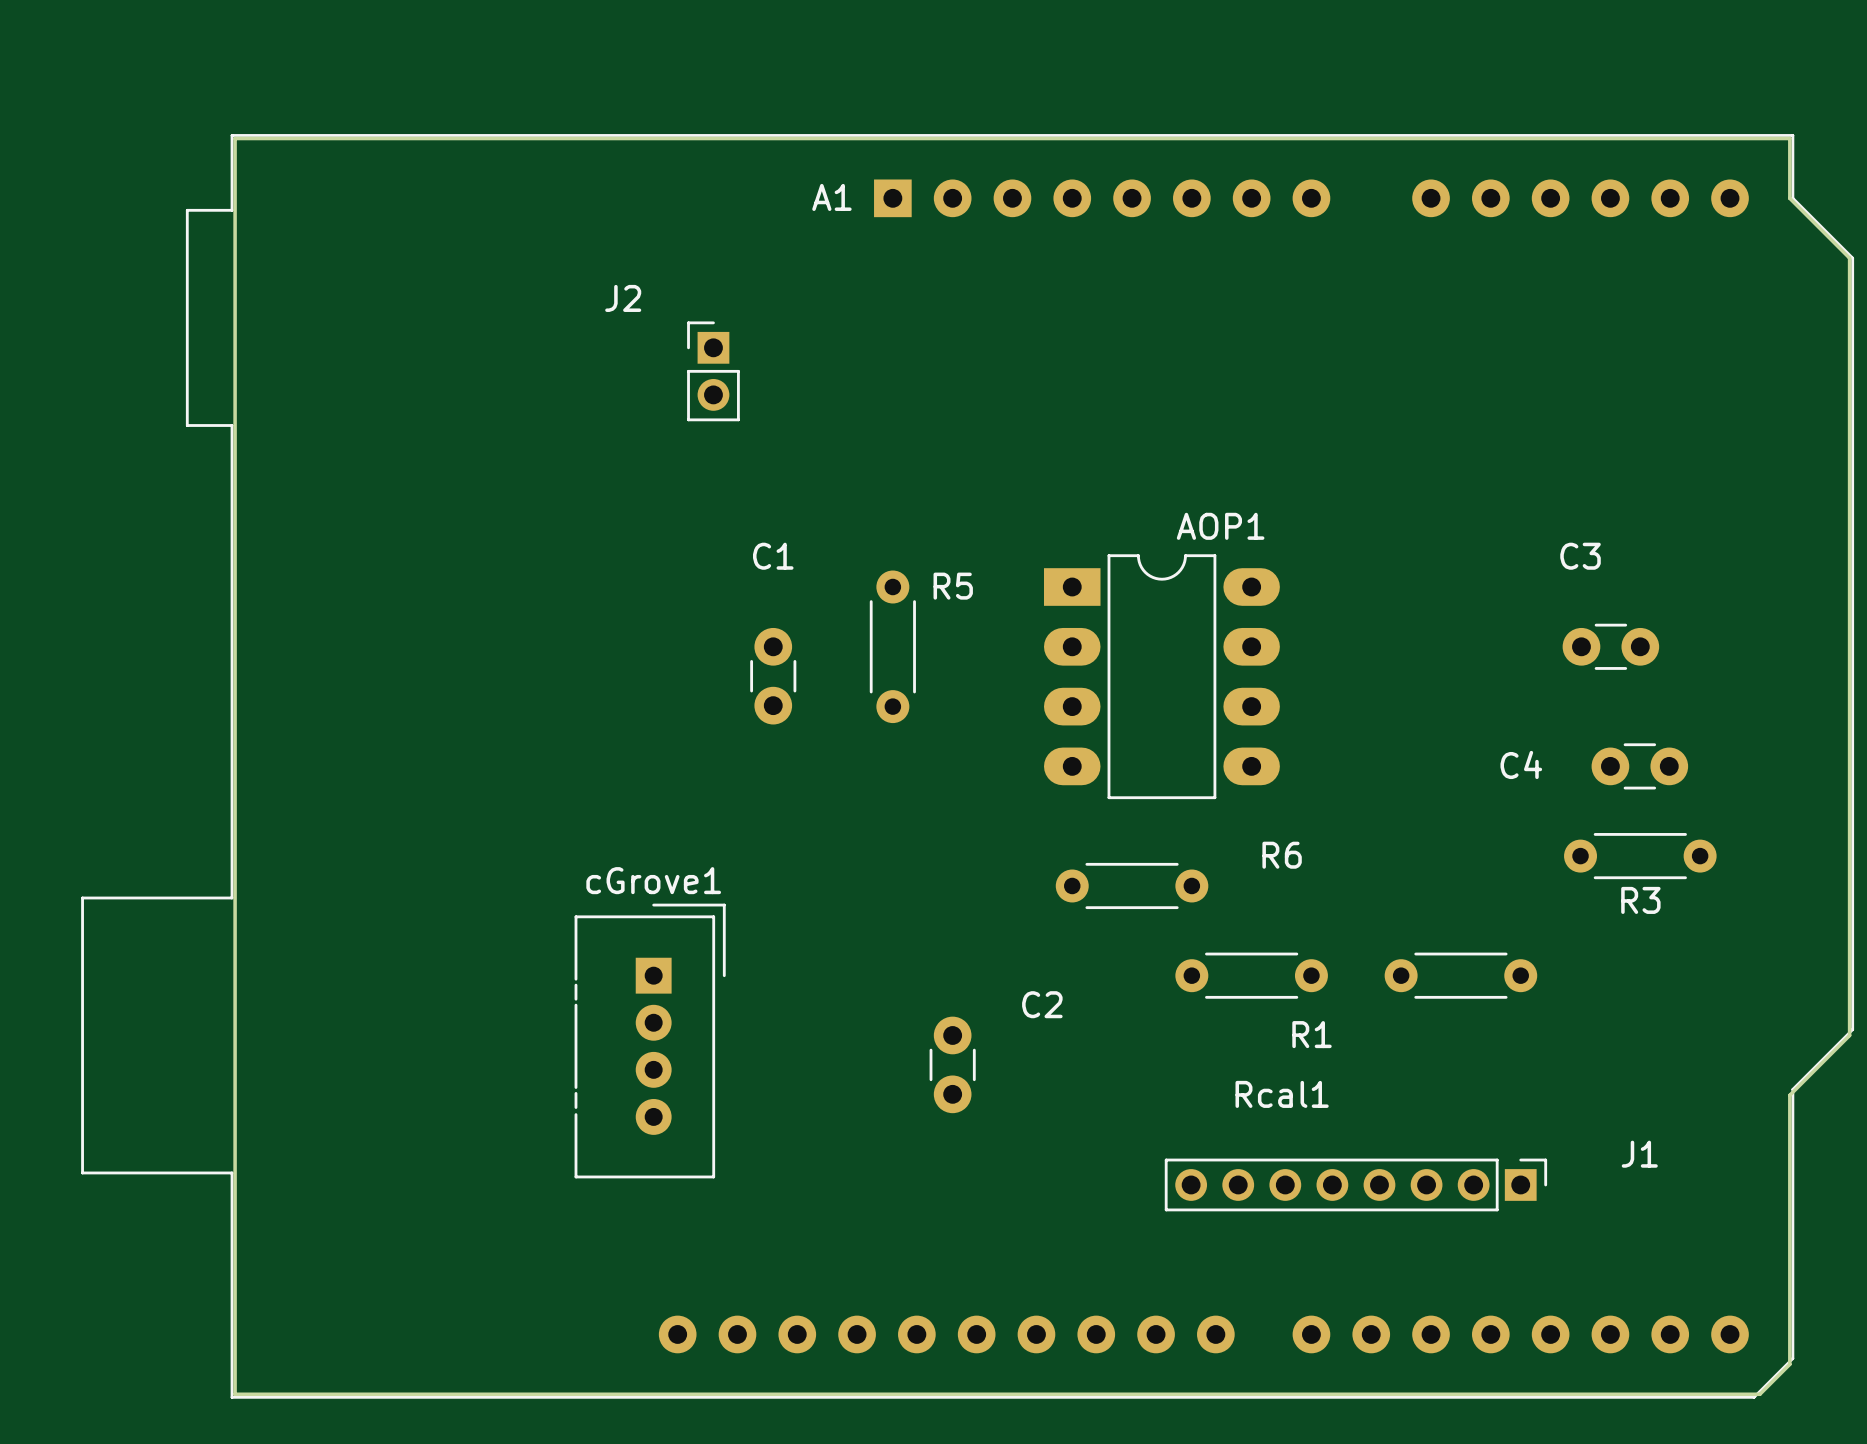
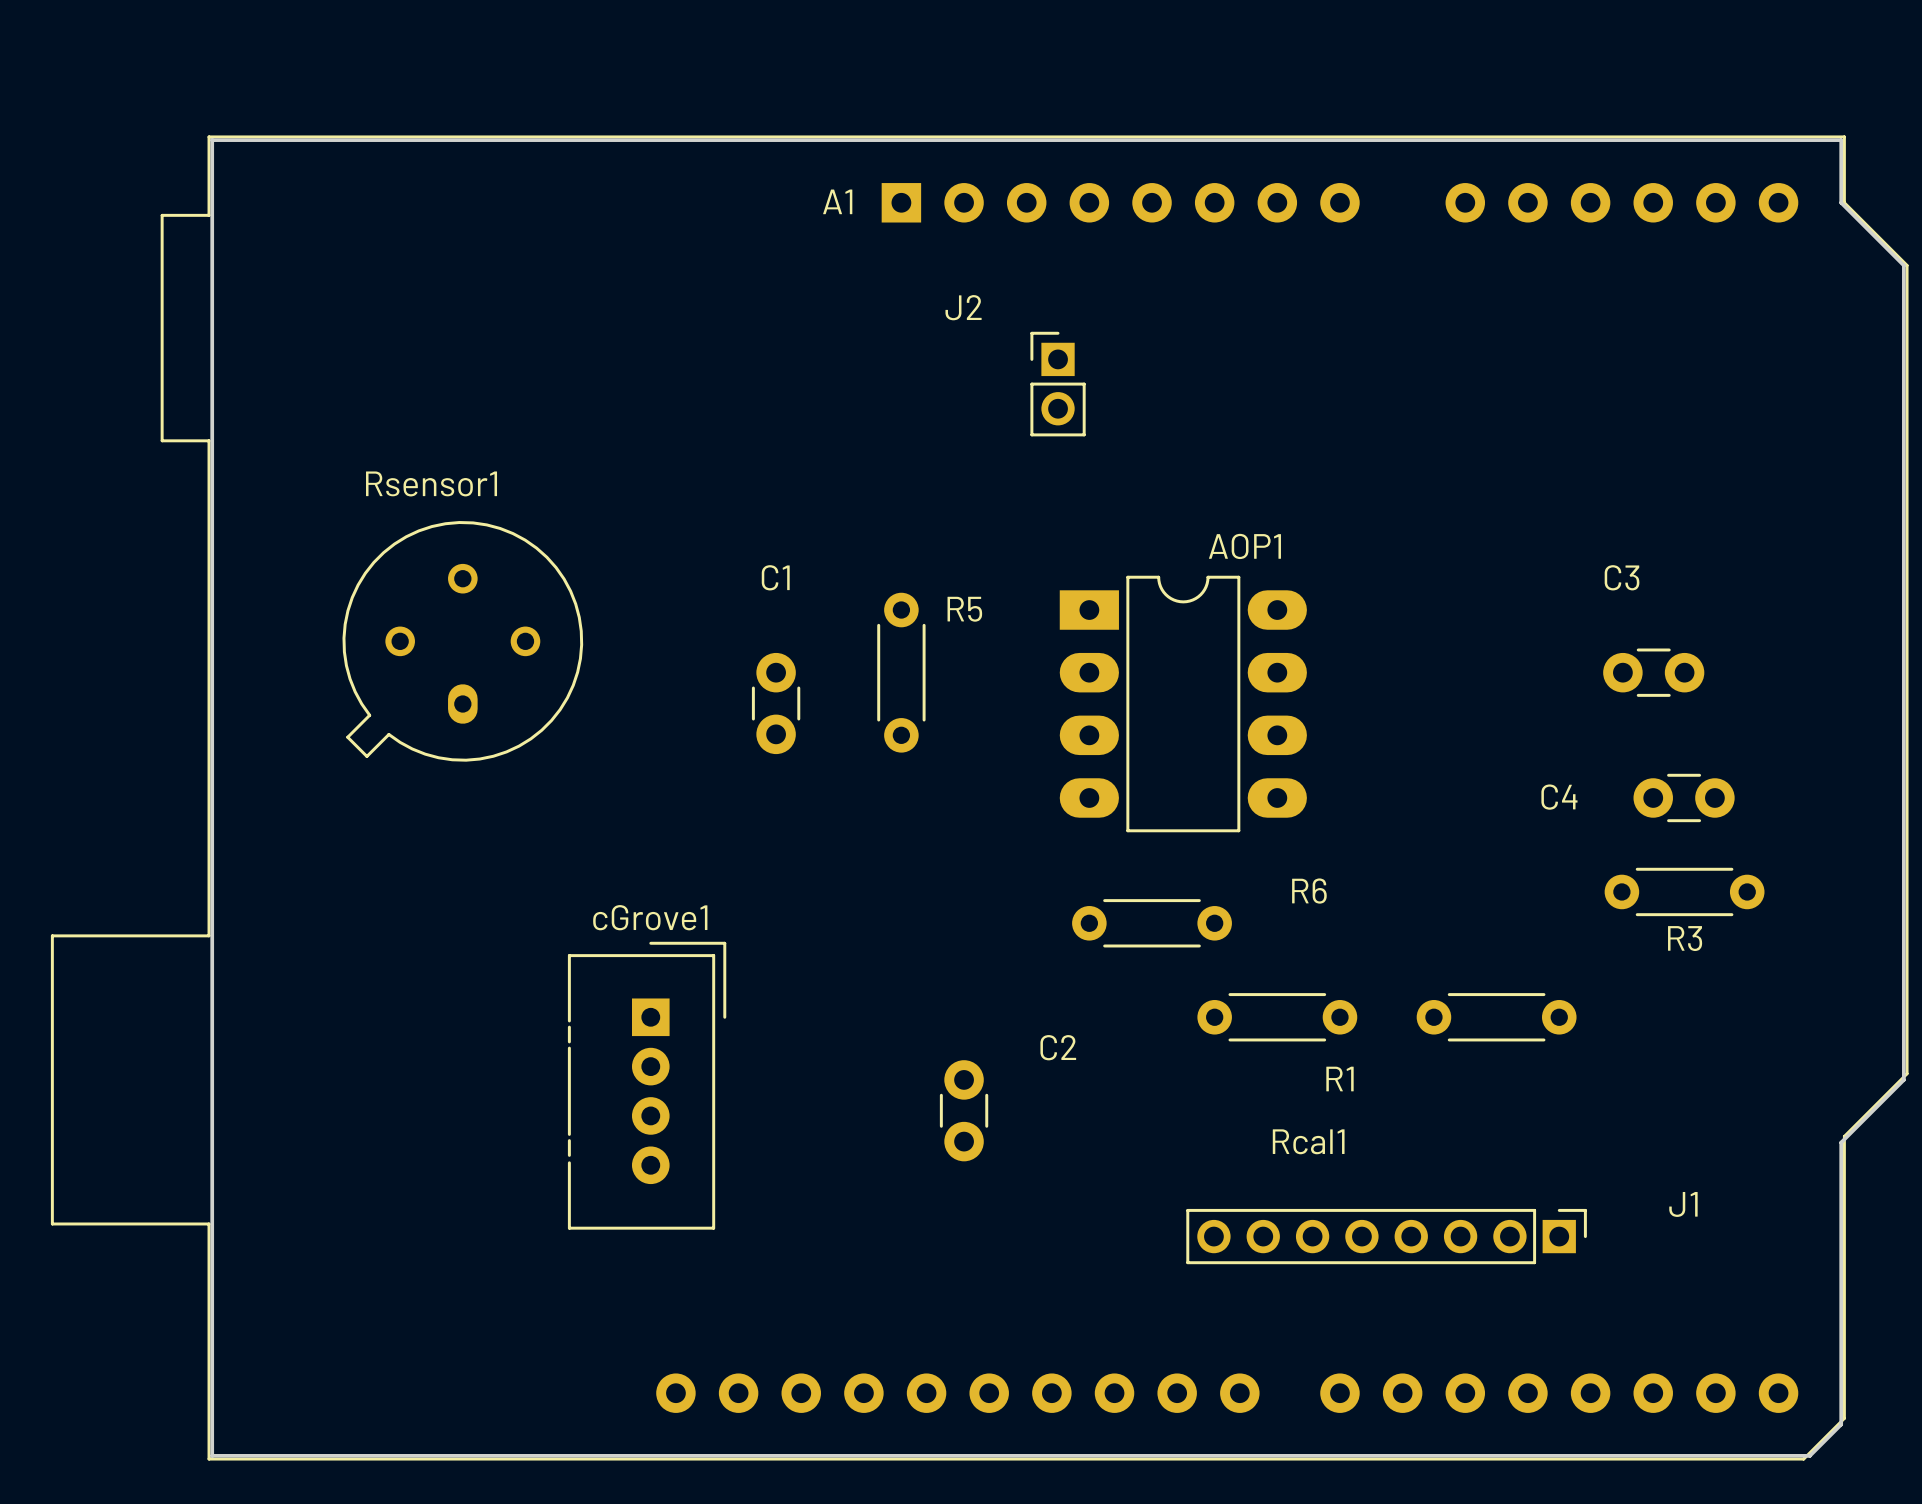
J2 position: (713, 371) -> (1058, 384)
Rsensor1: none -> (462, 641)

